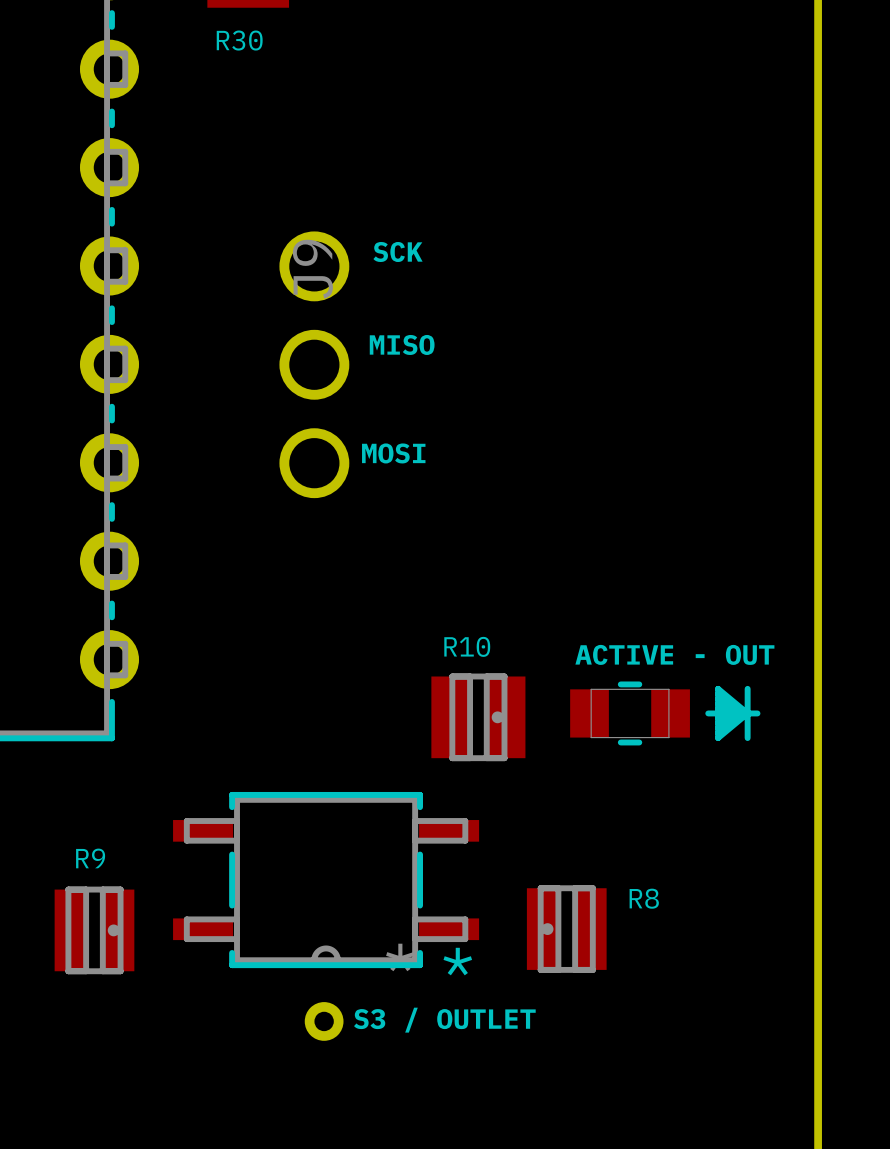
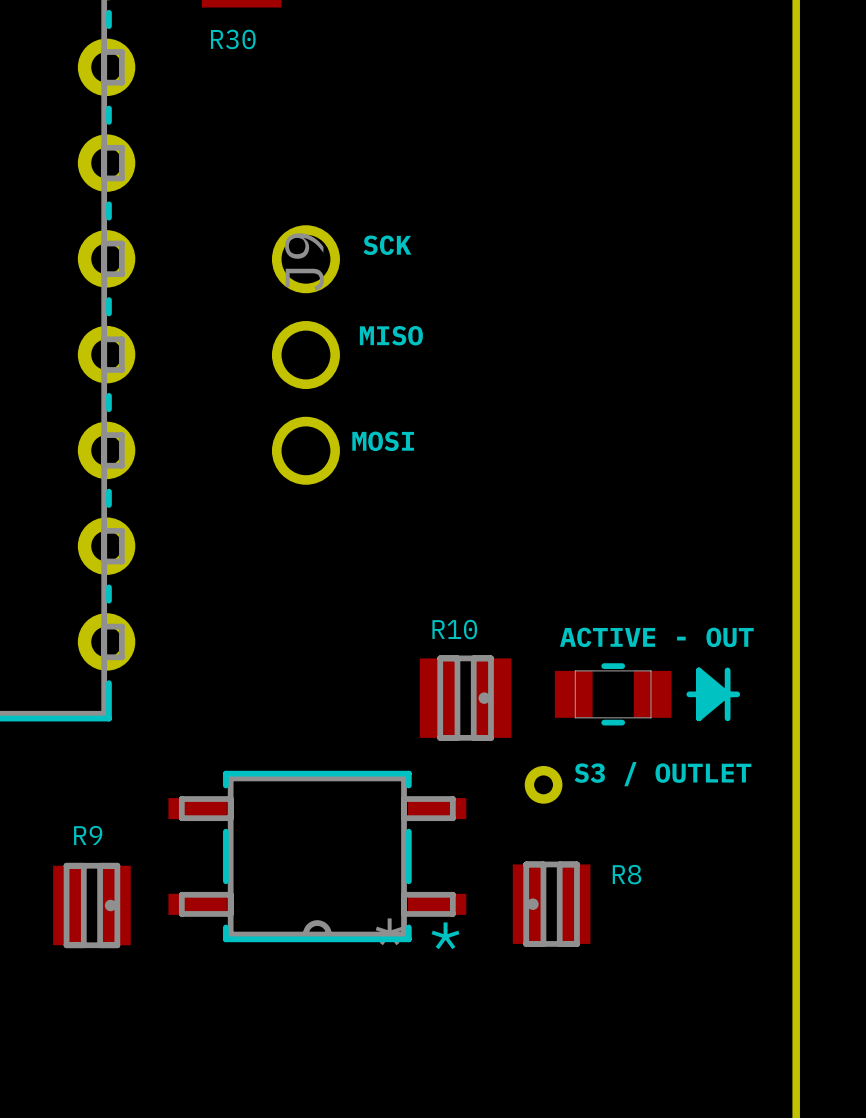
text position: S3 / OUTLET (444, 1020) -> S3 / OUTLET (662, 774)
part position: (324, 1021) -> (543, 784)

